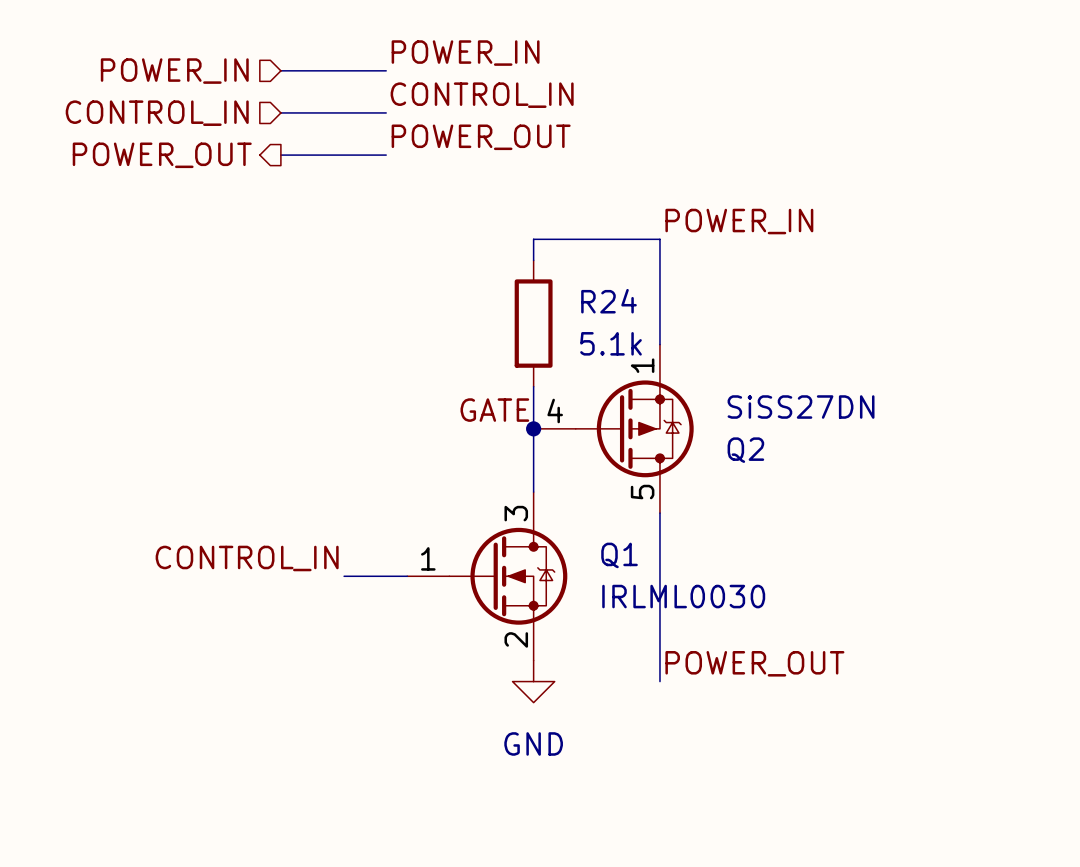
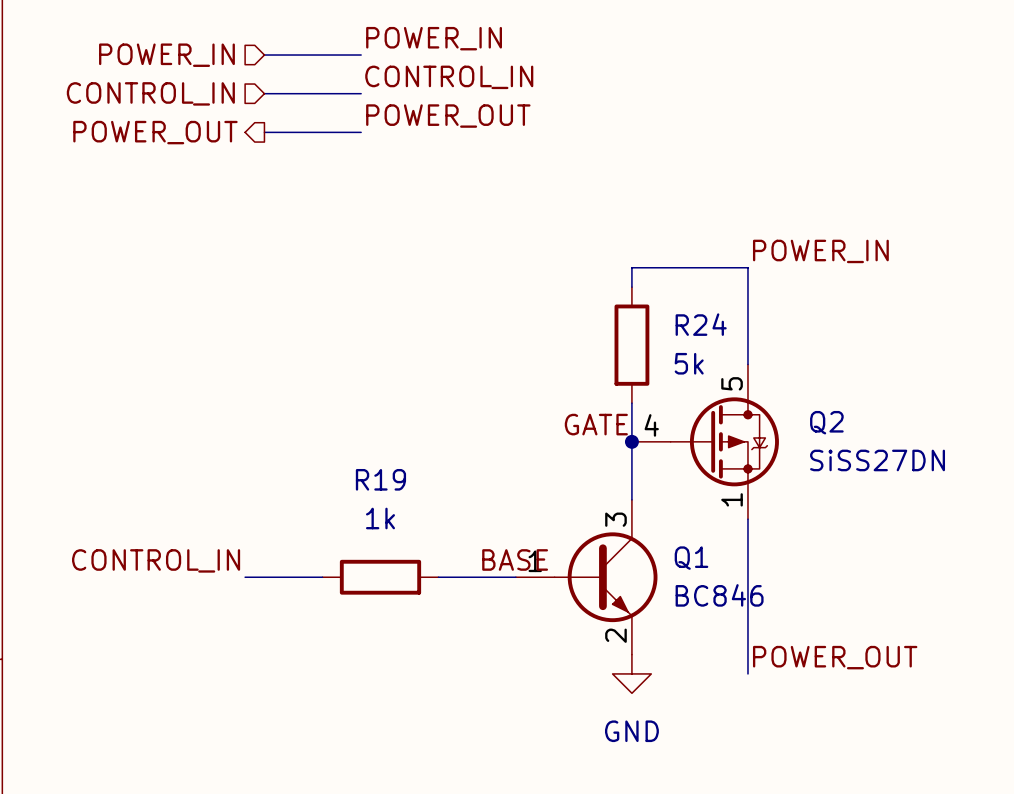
label position: POWER_IN (739, 221) -> POWER_IN (820, 251)
wire: (533, 260) (533, 239) (659, 239) (659, 344) -> (631, 287) (631, 267) (747, 267) (747, 364)
R24 position: (533, 323) -> (631, 345)
R24 value: 5.1k (611, 343) -> 5k (689, 363)
wire: (533, 386) (533, 492) -> (631, 403) (631, 499)
label position: GATE (494, 410) -> GATE (596, 424)
junction: (533, 428) -> none
Q2 position: (613, 428) -> (705, 441)
Q2 flip: as is (634, 428) -> up-down (724, 441)
Q1 symbol: [407, 492, 568, 661] -> [515, 499, 658, 655]
junction: none -> (631, 441)
wire: (659, 513) (659, 681) -> (747, 519) (747, 673)
label position: CONTROL_IN (247, 558) -> CONTROL_IN (156, 560)
wire: (344, 576) (407, 576) -> none
Q1 value: IRLML0030 (683, 596) -> BC846 (719, 595)
label: none -> BASE (515, 559)
wire: none -> (245, 577) (322, 577)
R19: none -> 1k (380, 577)
wire: none -> (438, 577) (515, 577)
label position: POWER_OUT (754, 663) -> POWER_OUT (835, 657)
power symbol position: GND (533, 681) -> GND (631, 673)

